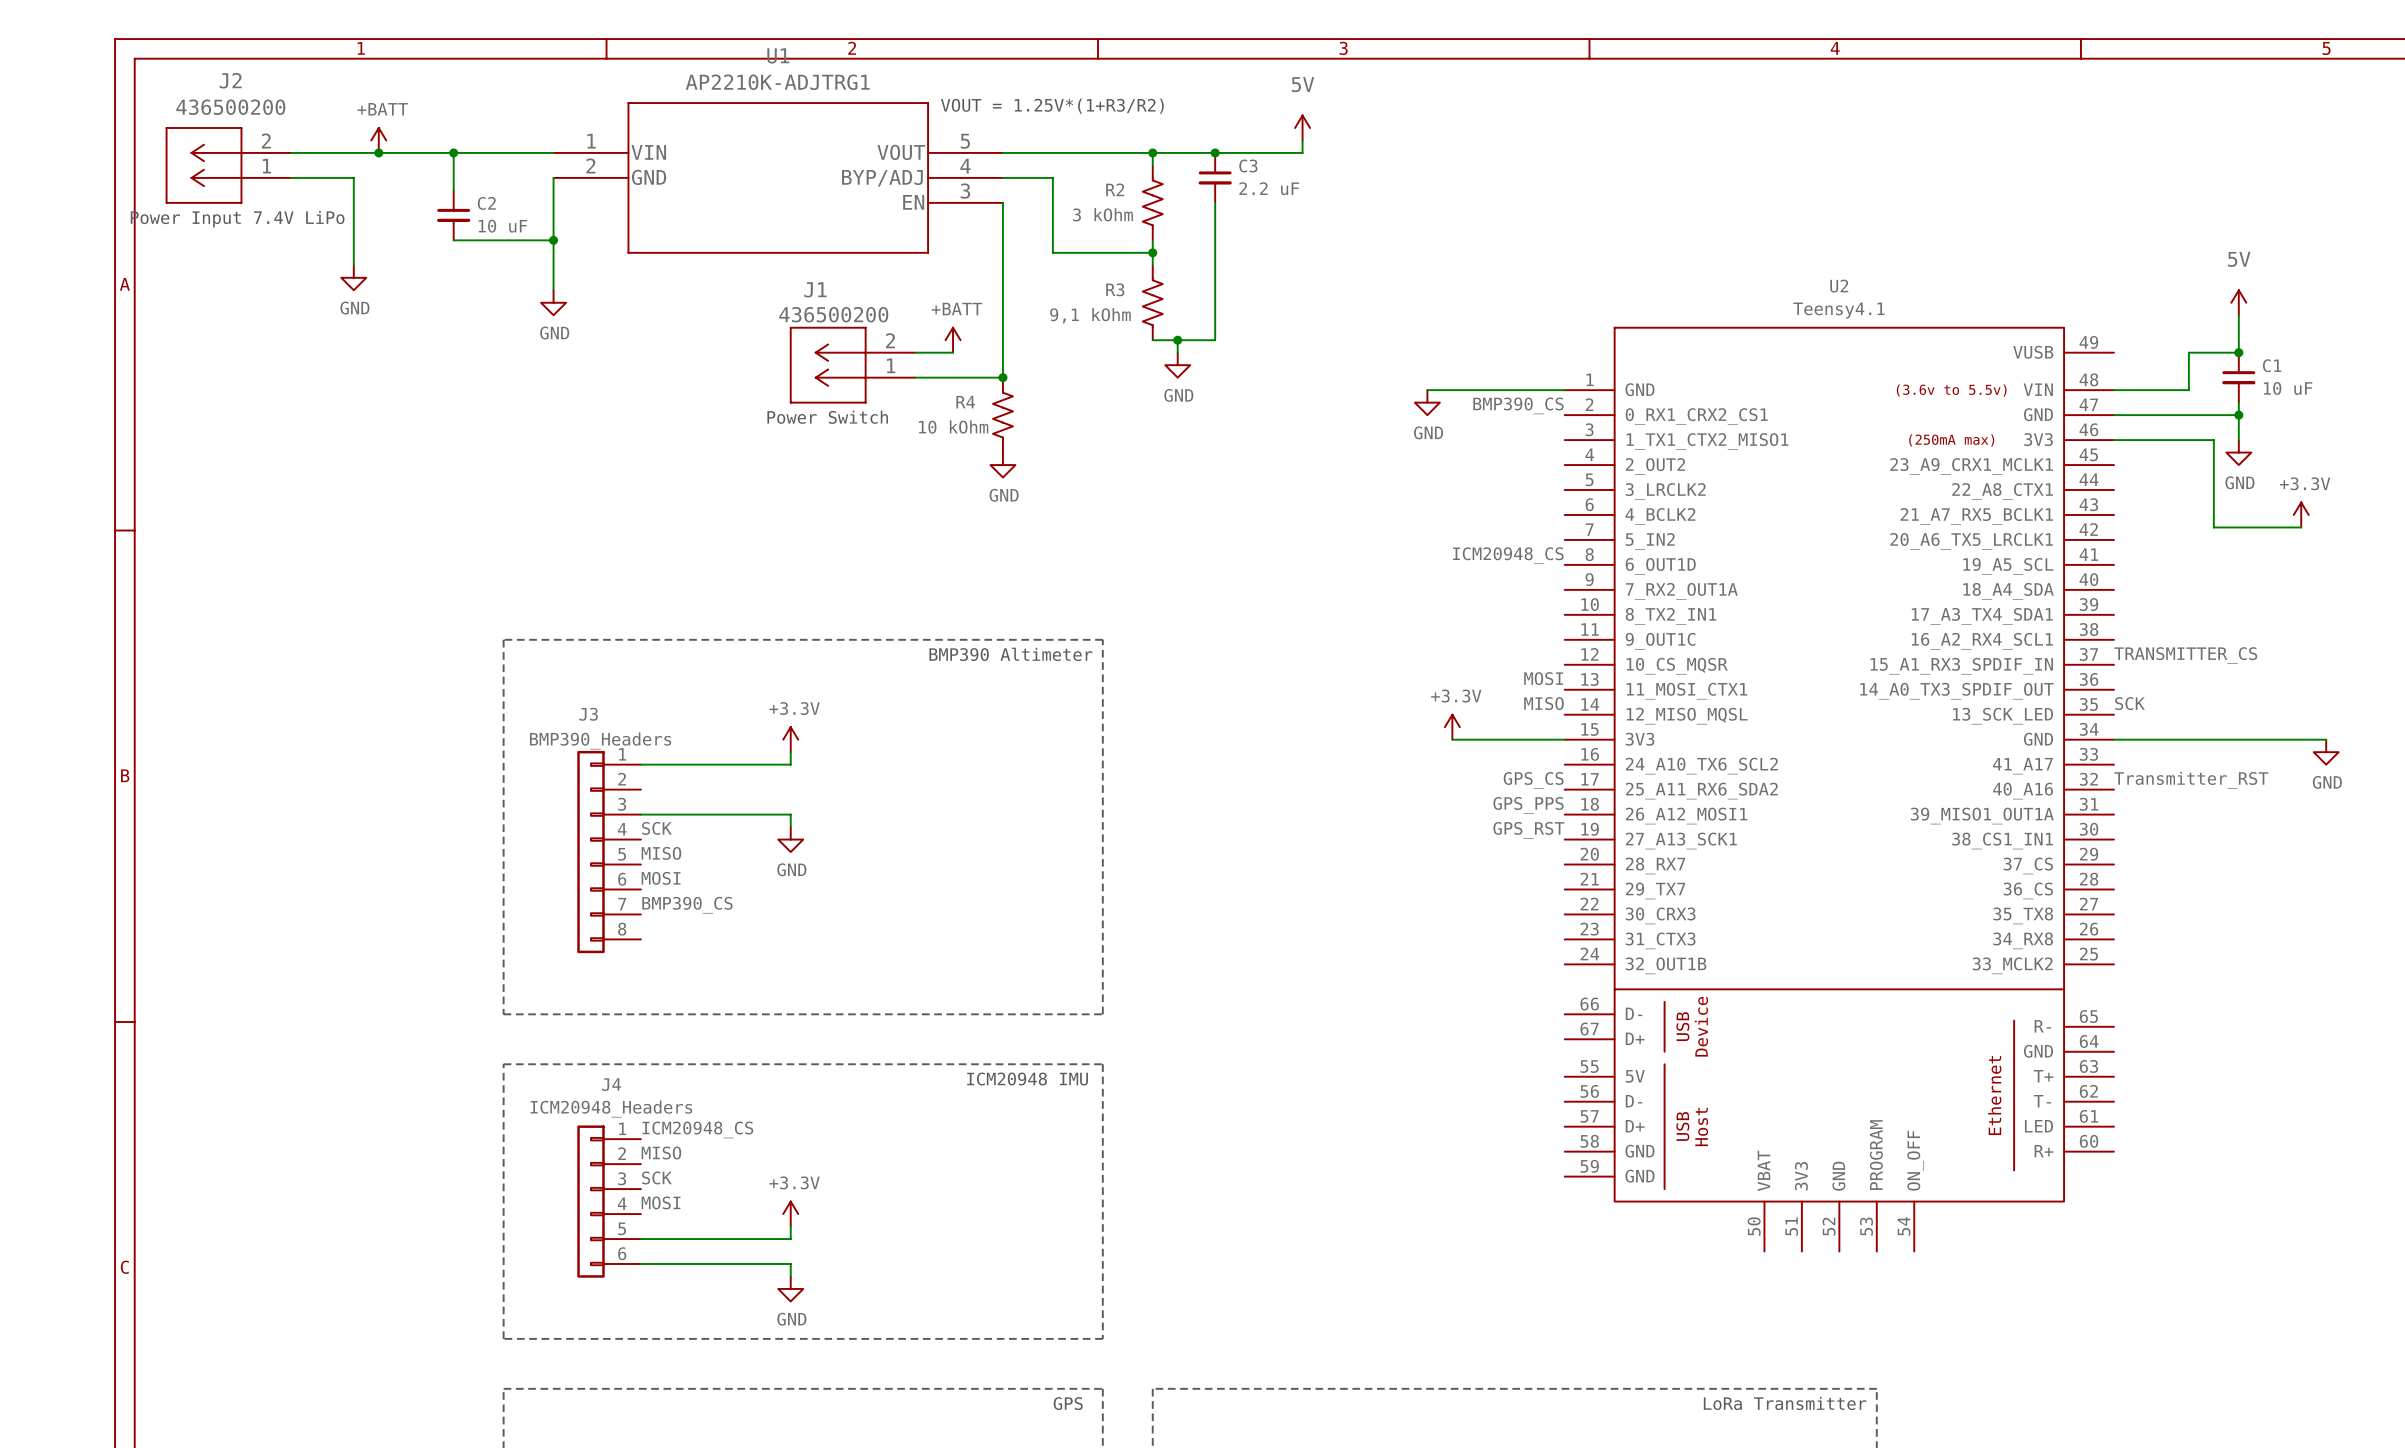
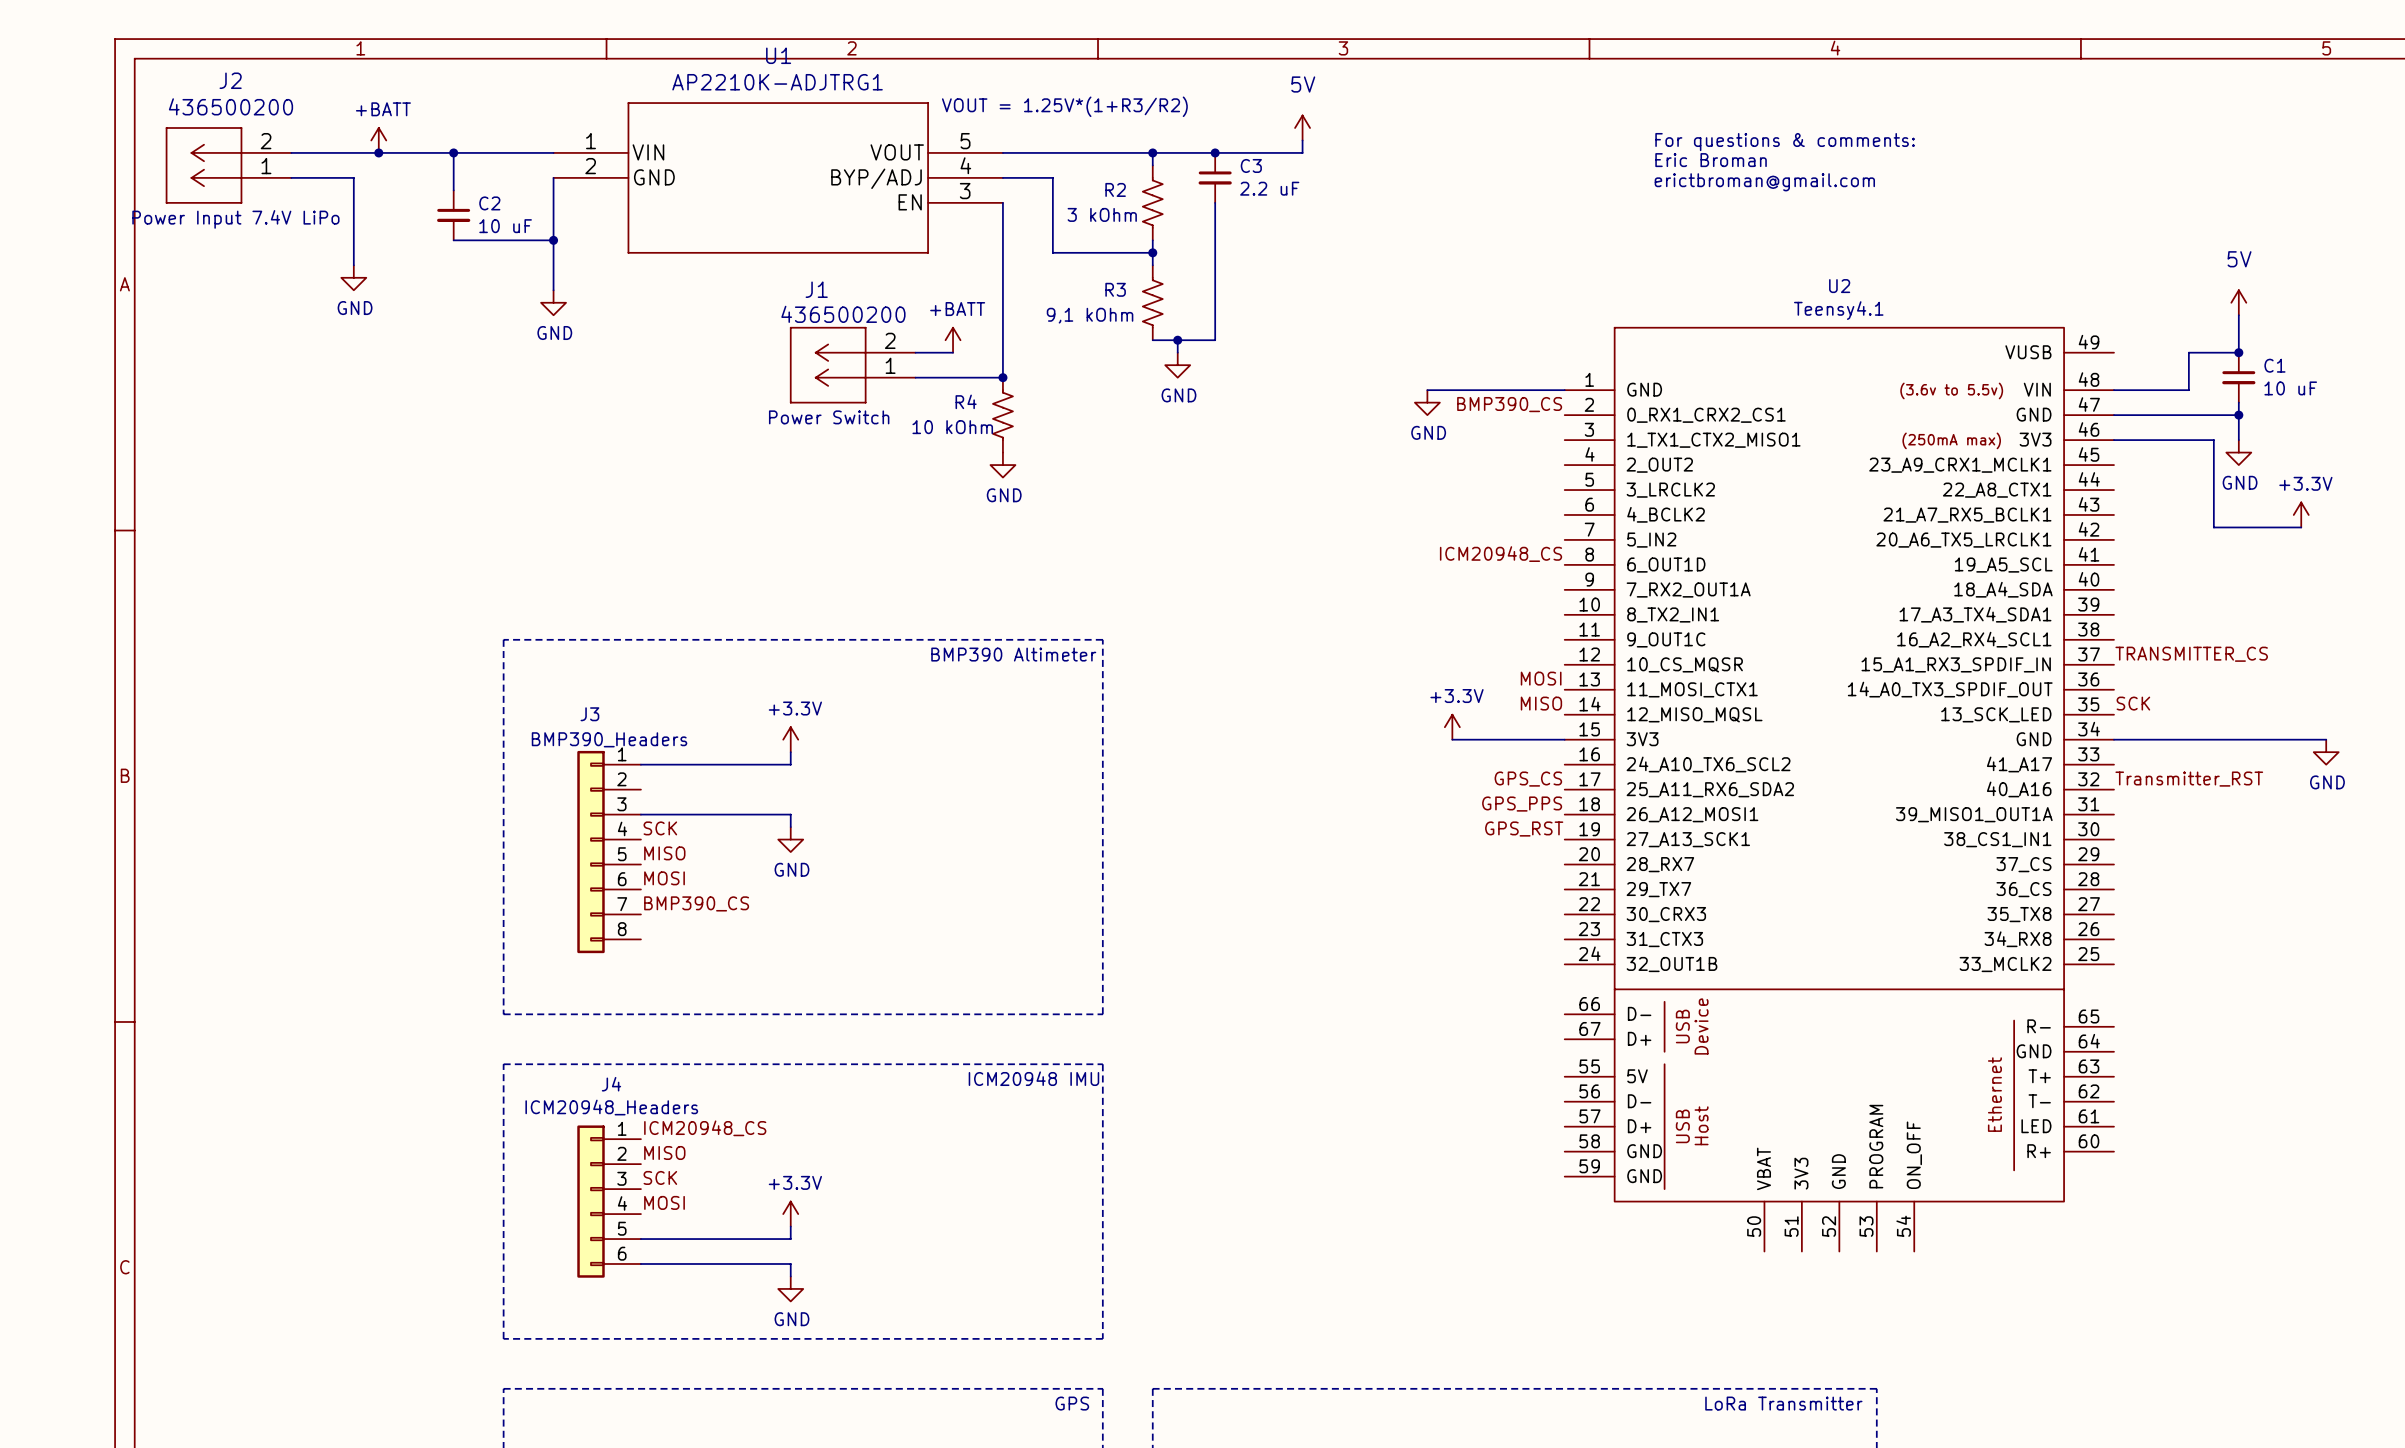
text: none -> For questions & comments: (1785, 142)
text: none -> Eric Broman (1711, 160)
text: none -> erictbroman@gmail.com (1764, 182)

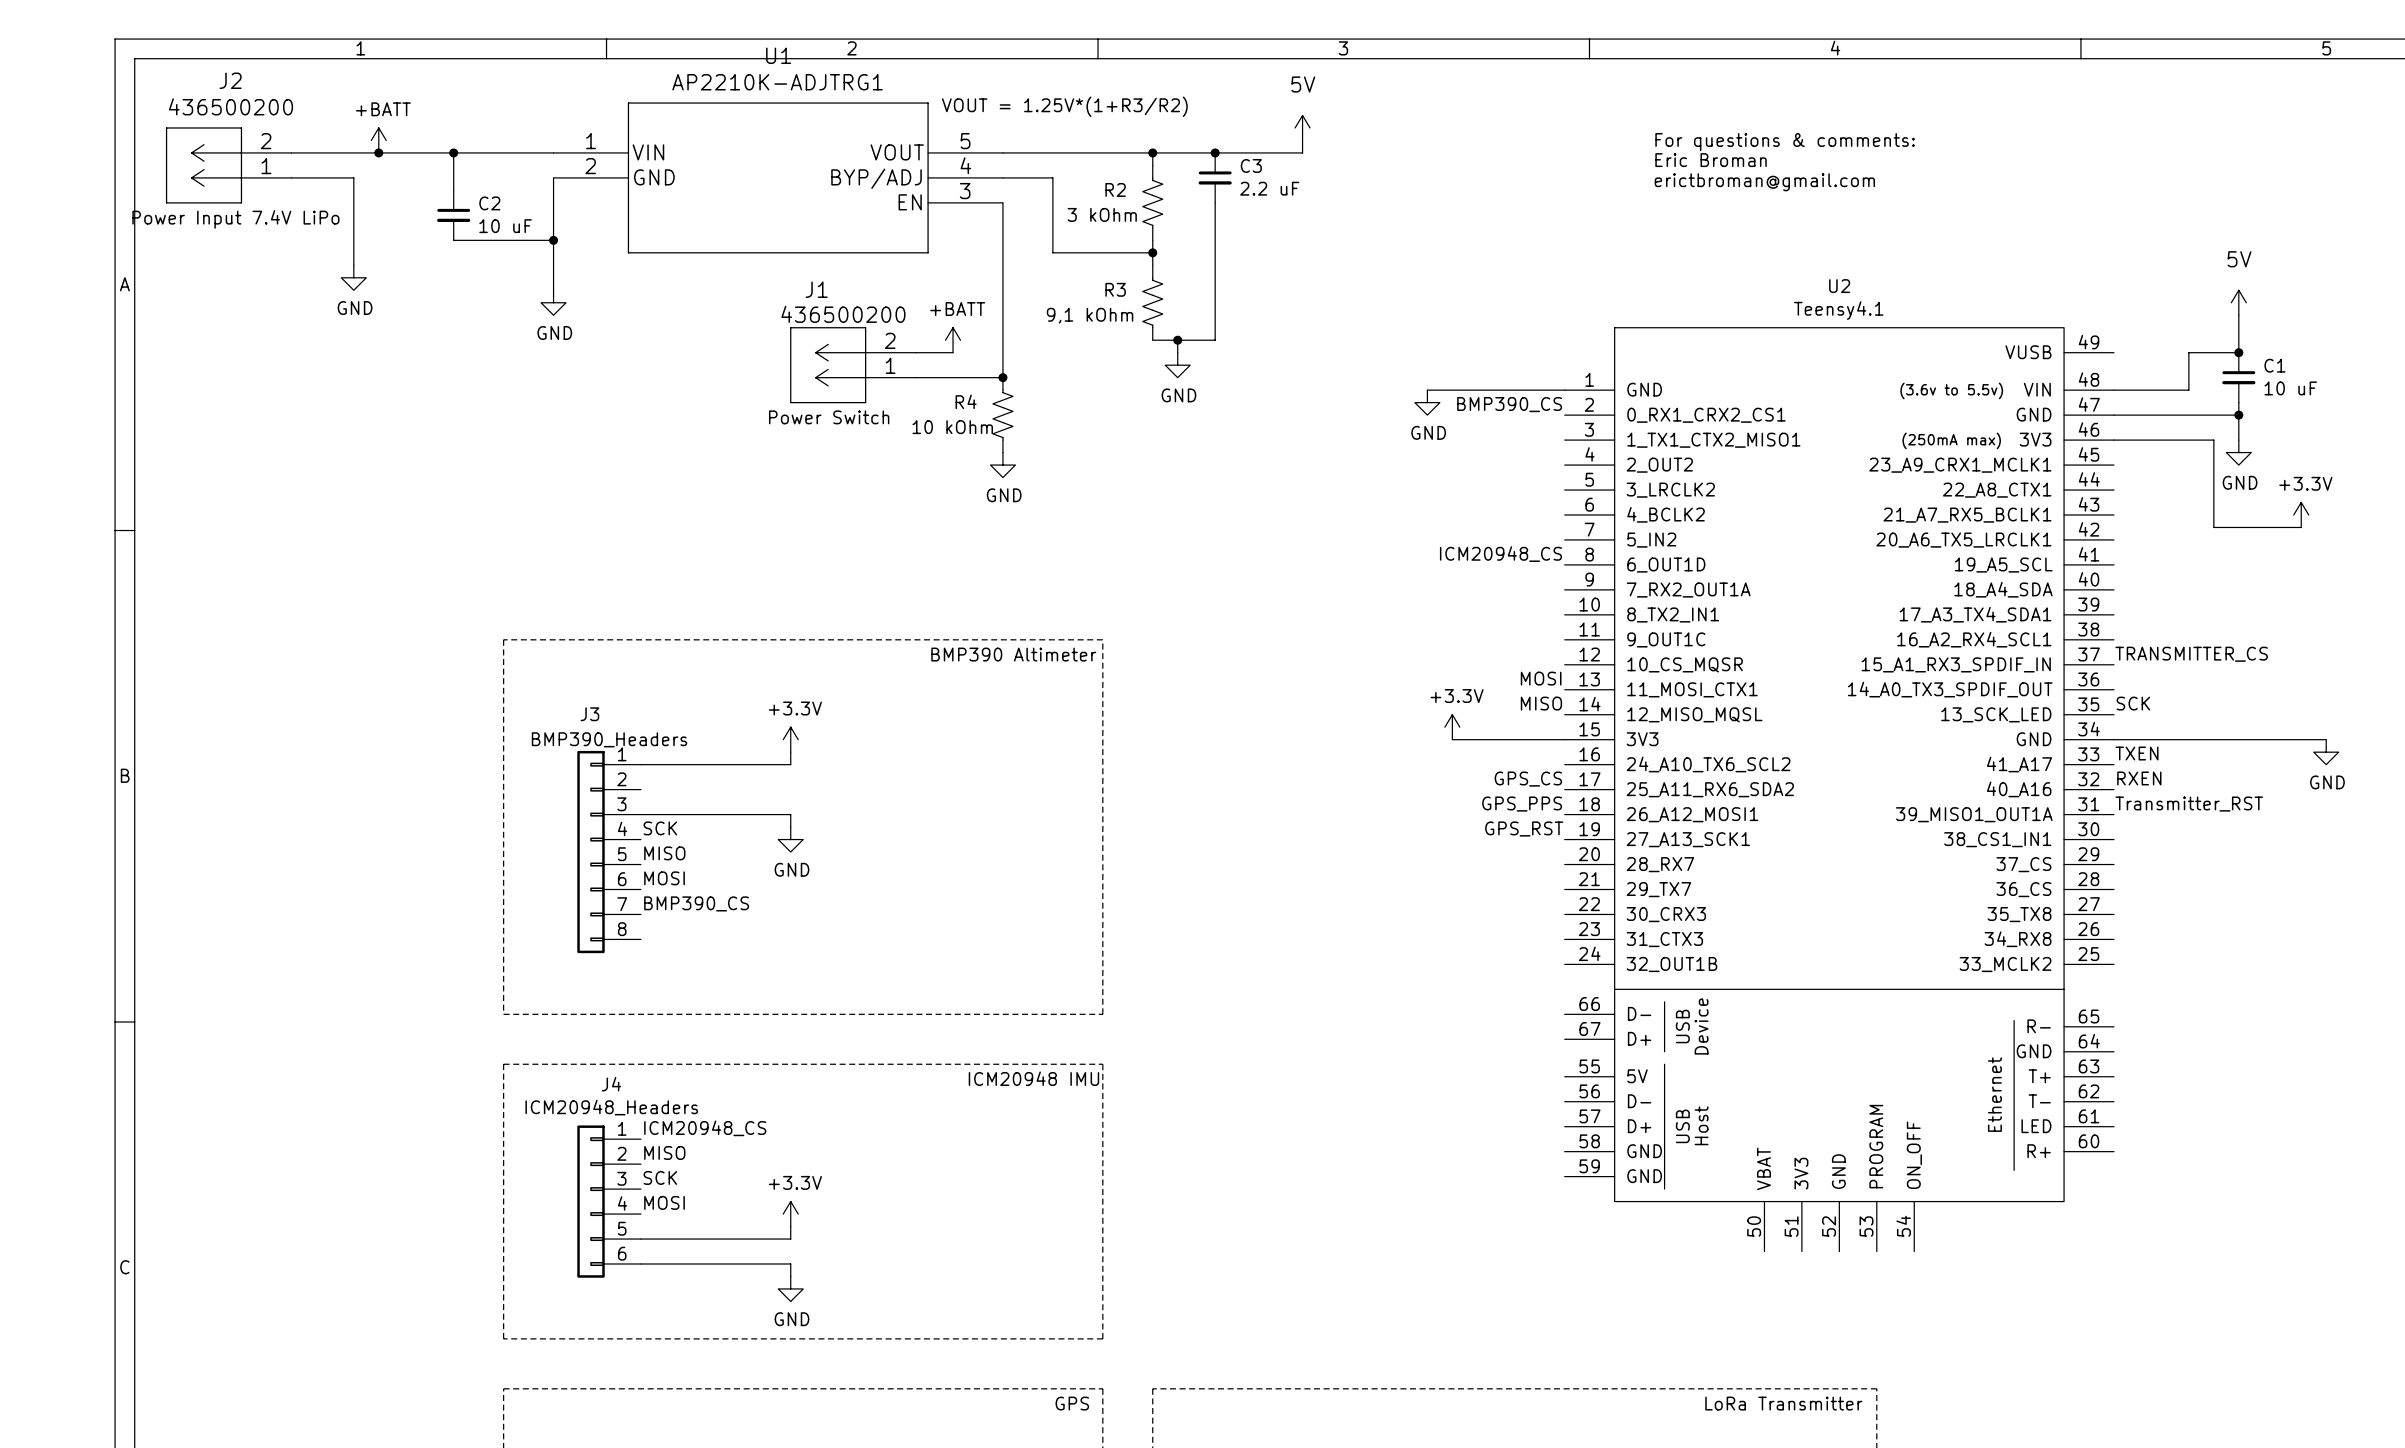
label: none -> TXEN (2136, 753)
label: Transmitter_RST (2189, 779) -> RXEN (2139, 778)
label: none -> Transmitter_RST (2189, 804)

